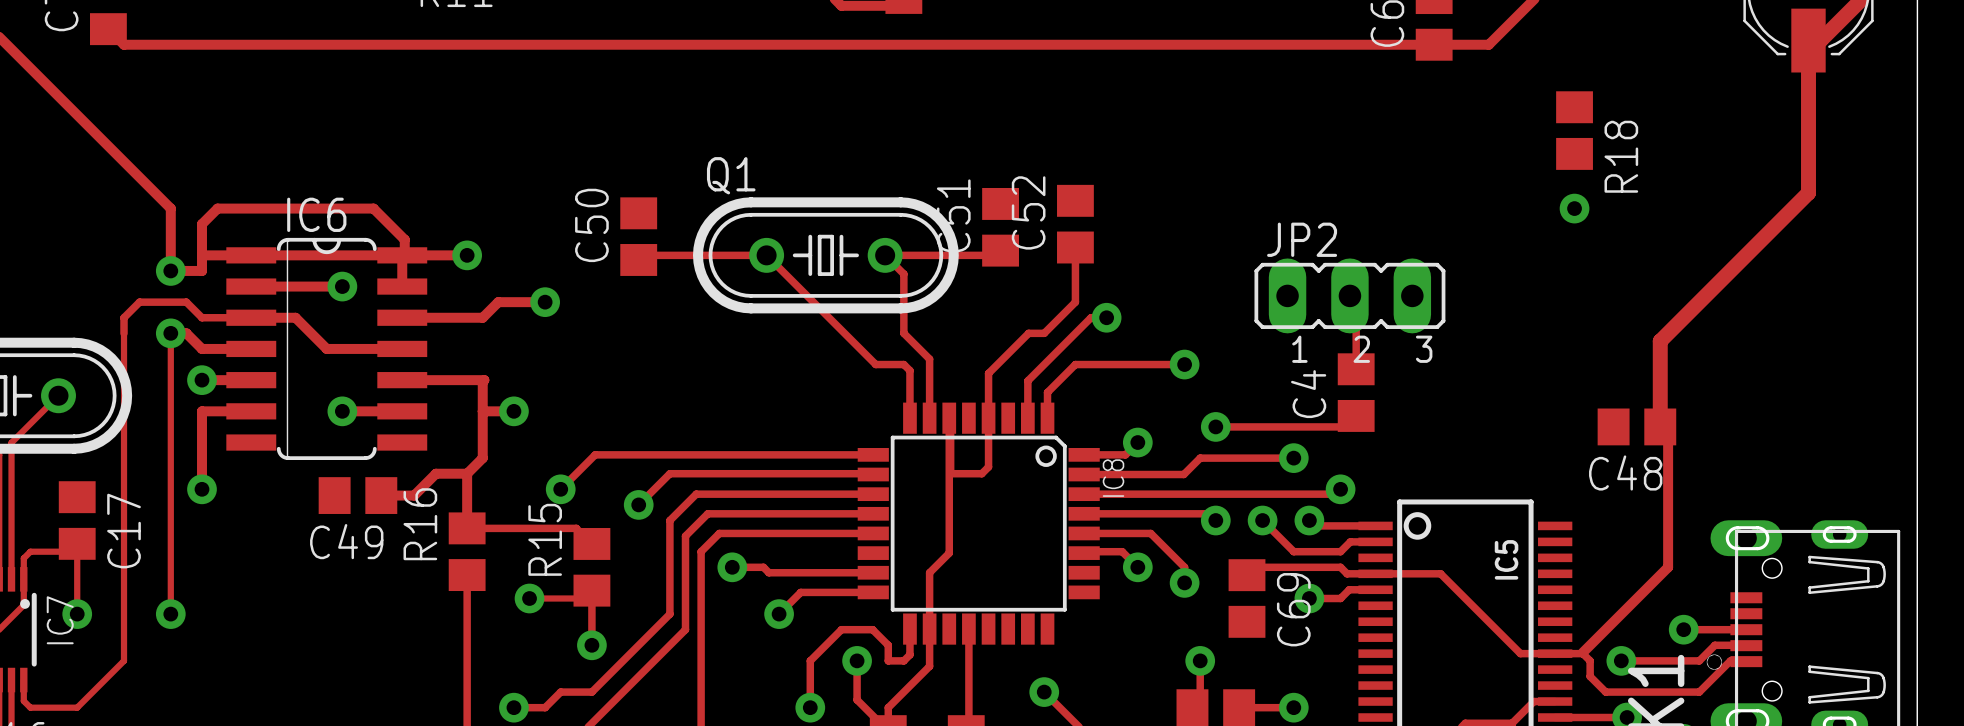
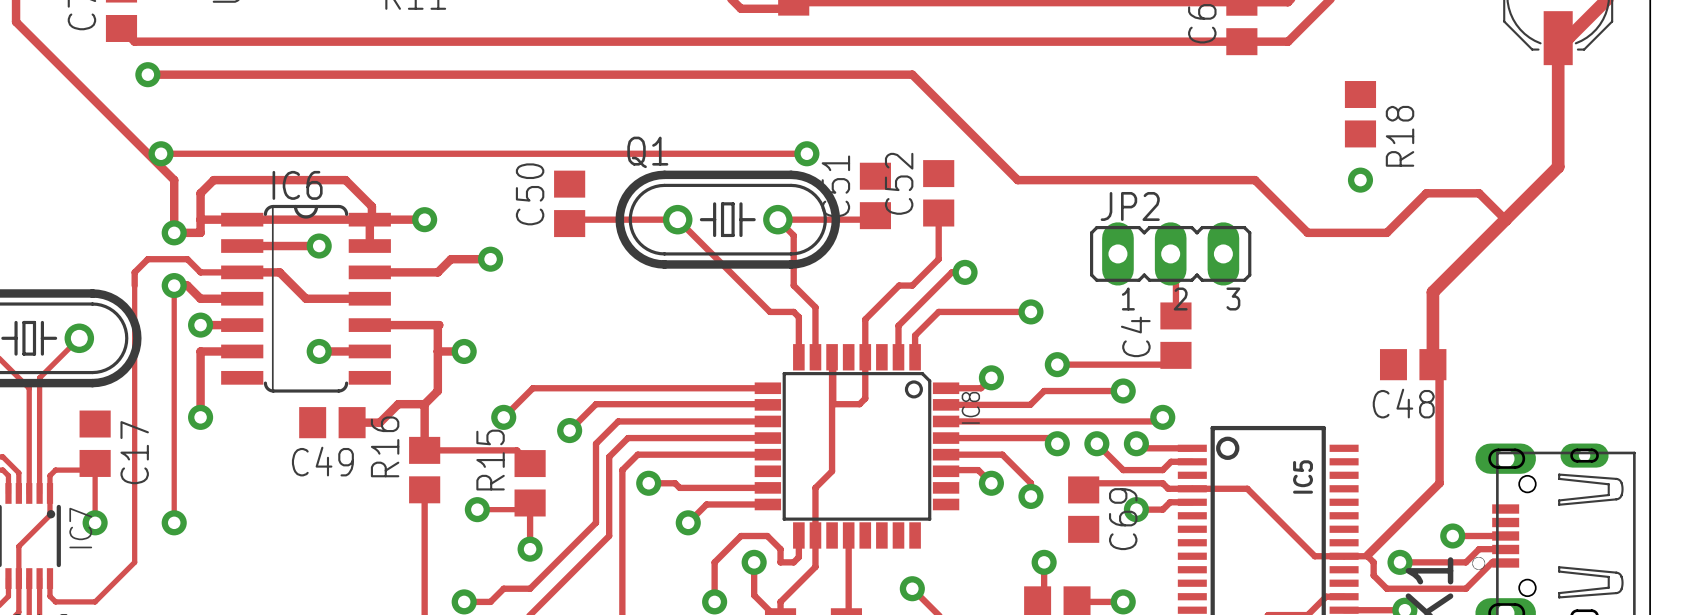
track: none -> (147, 74) (912, 74) (1017, 180) (1255, 180) (1307, 232) (1386, 232) (1426, 193) (1479, 193) (1505, 219)
via: none -> (147, 74)
track: none -> (161, 153) (806, 153)
via: none -> (161, 153)
via: none -> (806, 153)

